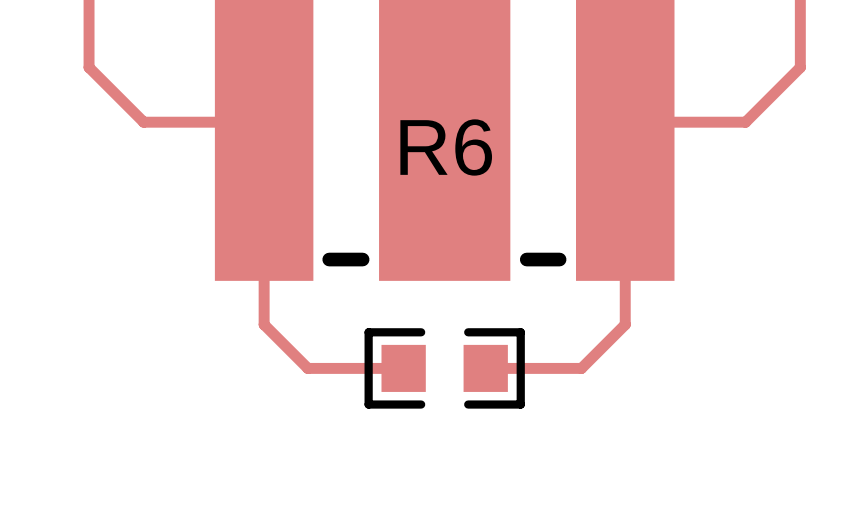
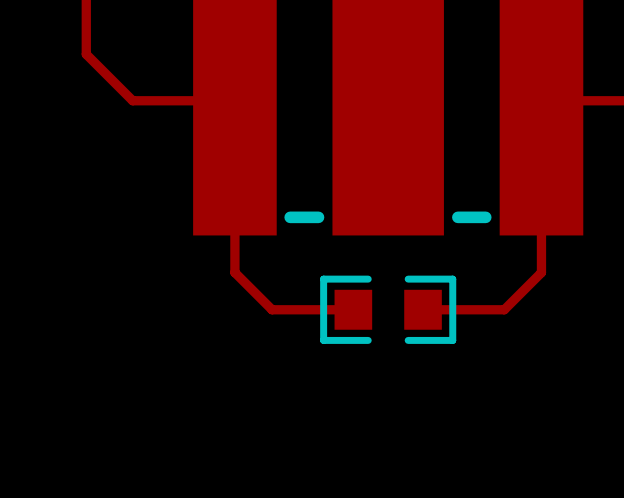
R6 name: R6 (446, 147) -> none

